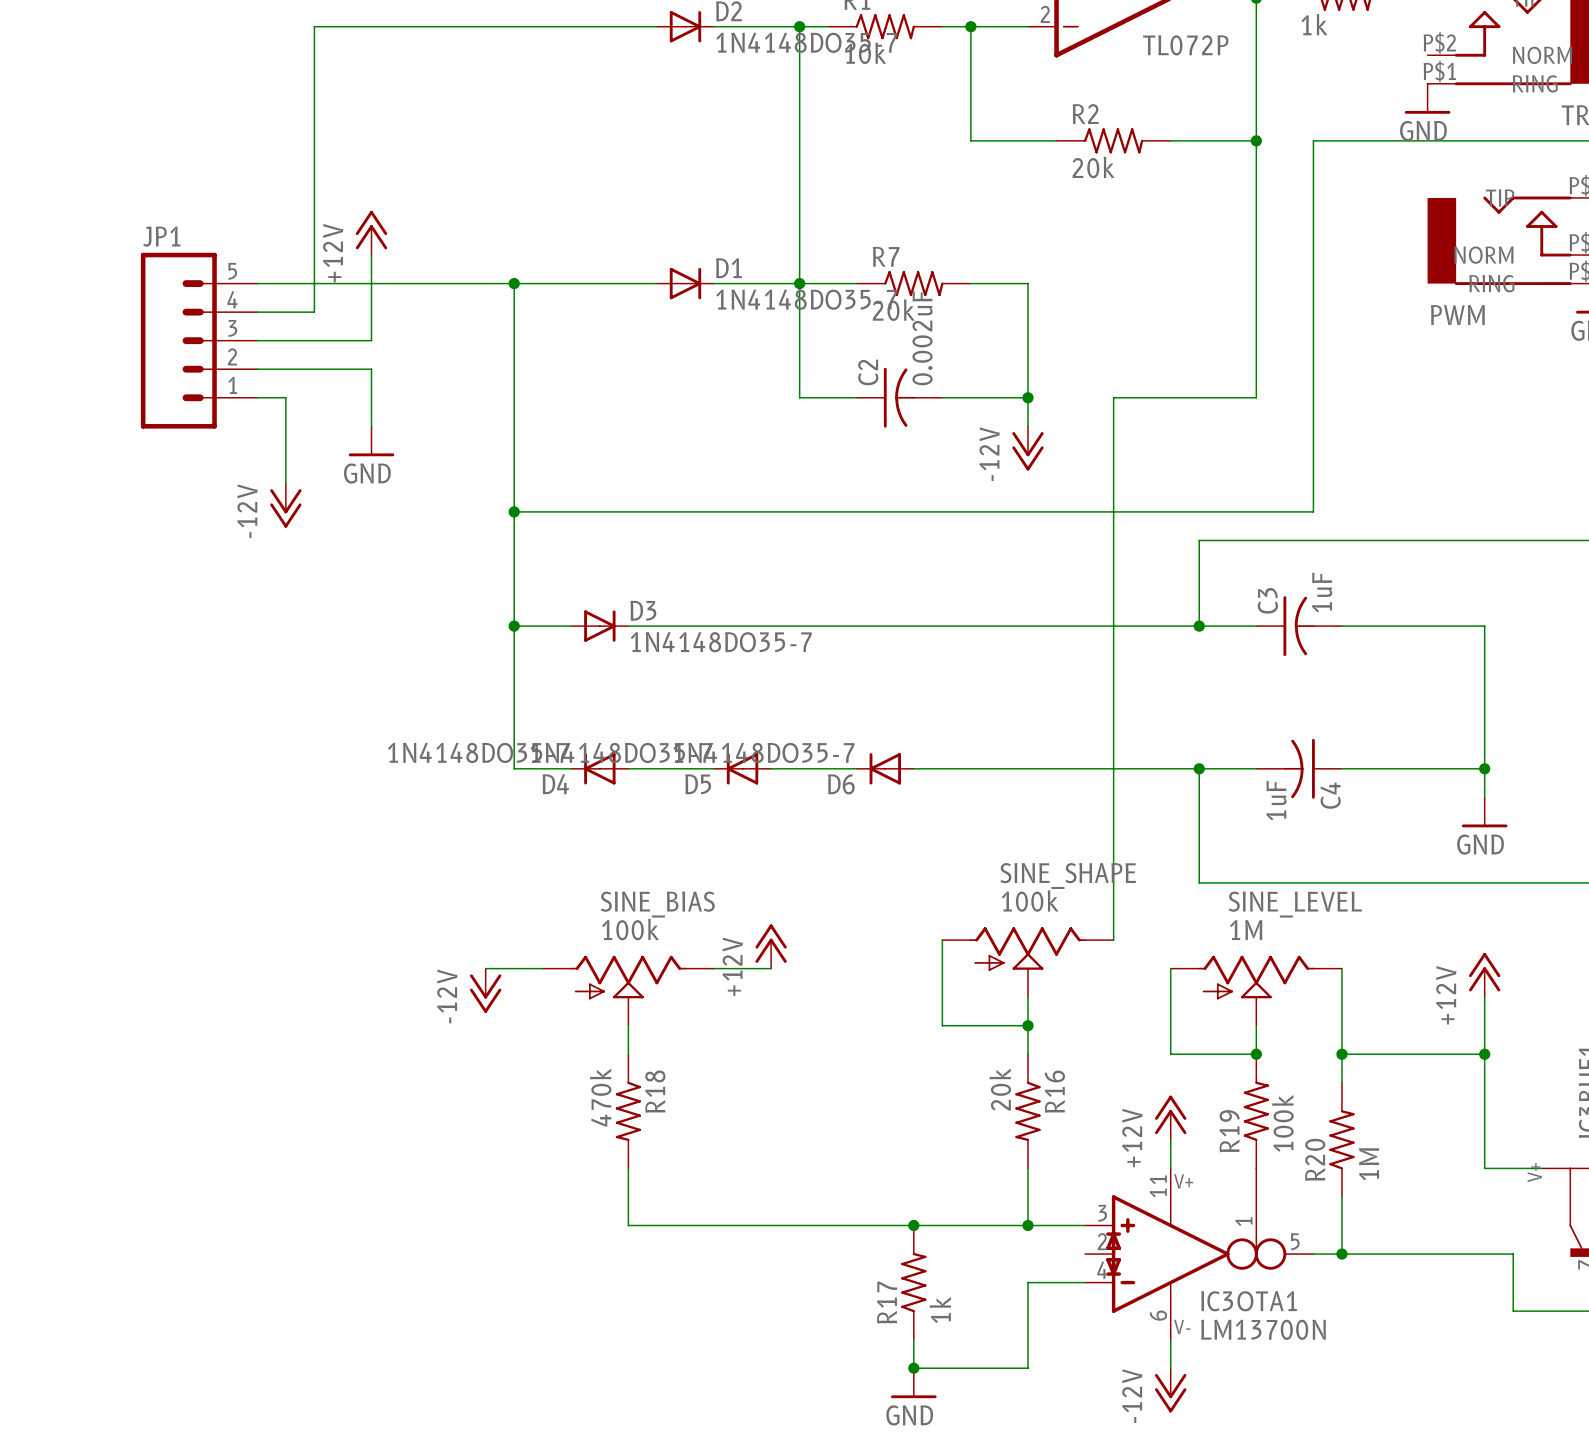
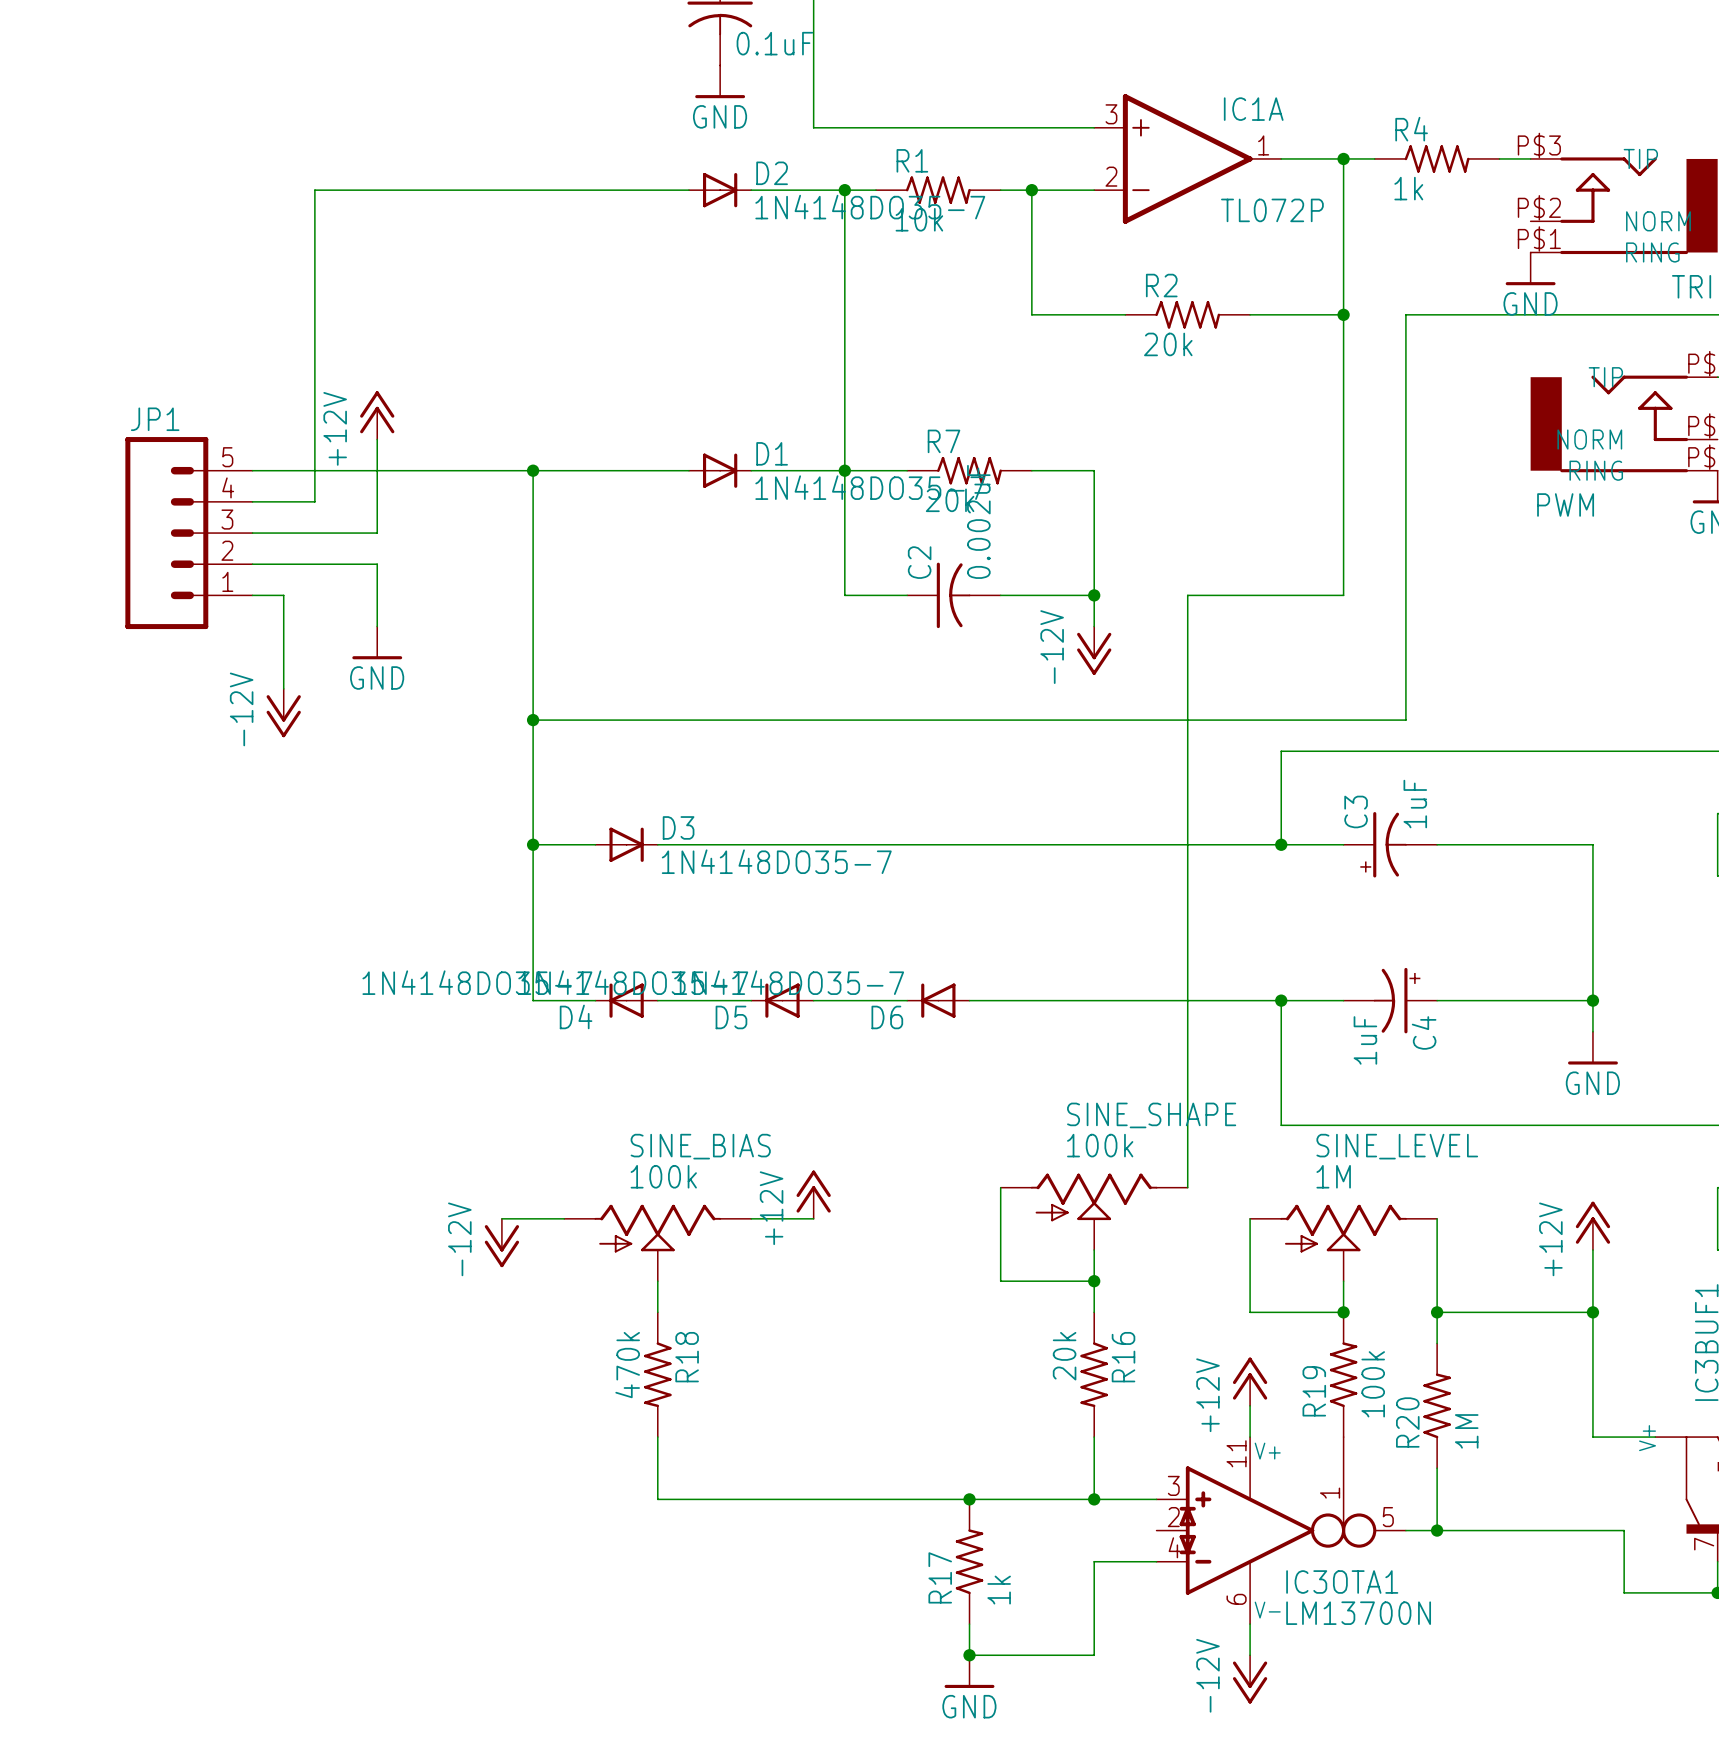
C3 symbol: [1256, 596, 1342, 657] -> [1343, 812, 1438, 878]
C4 symbol: [1256, 738, 1342, 799] -> [1343, 967, 1438, 1034]

